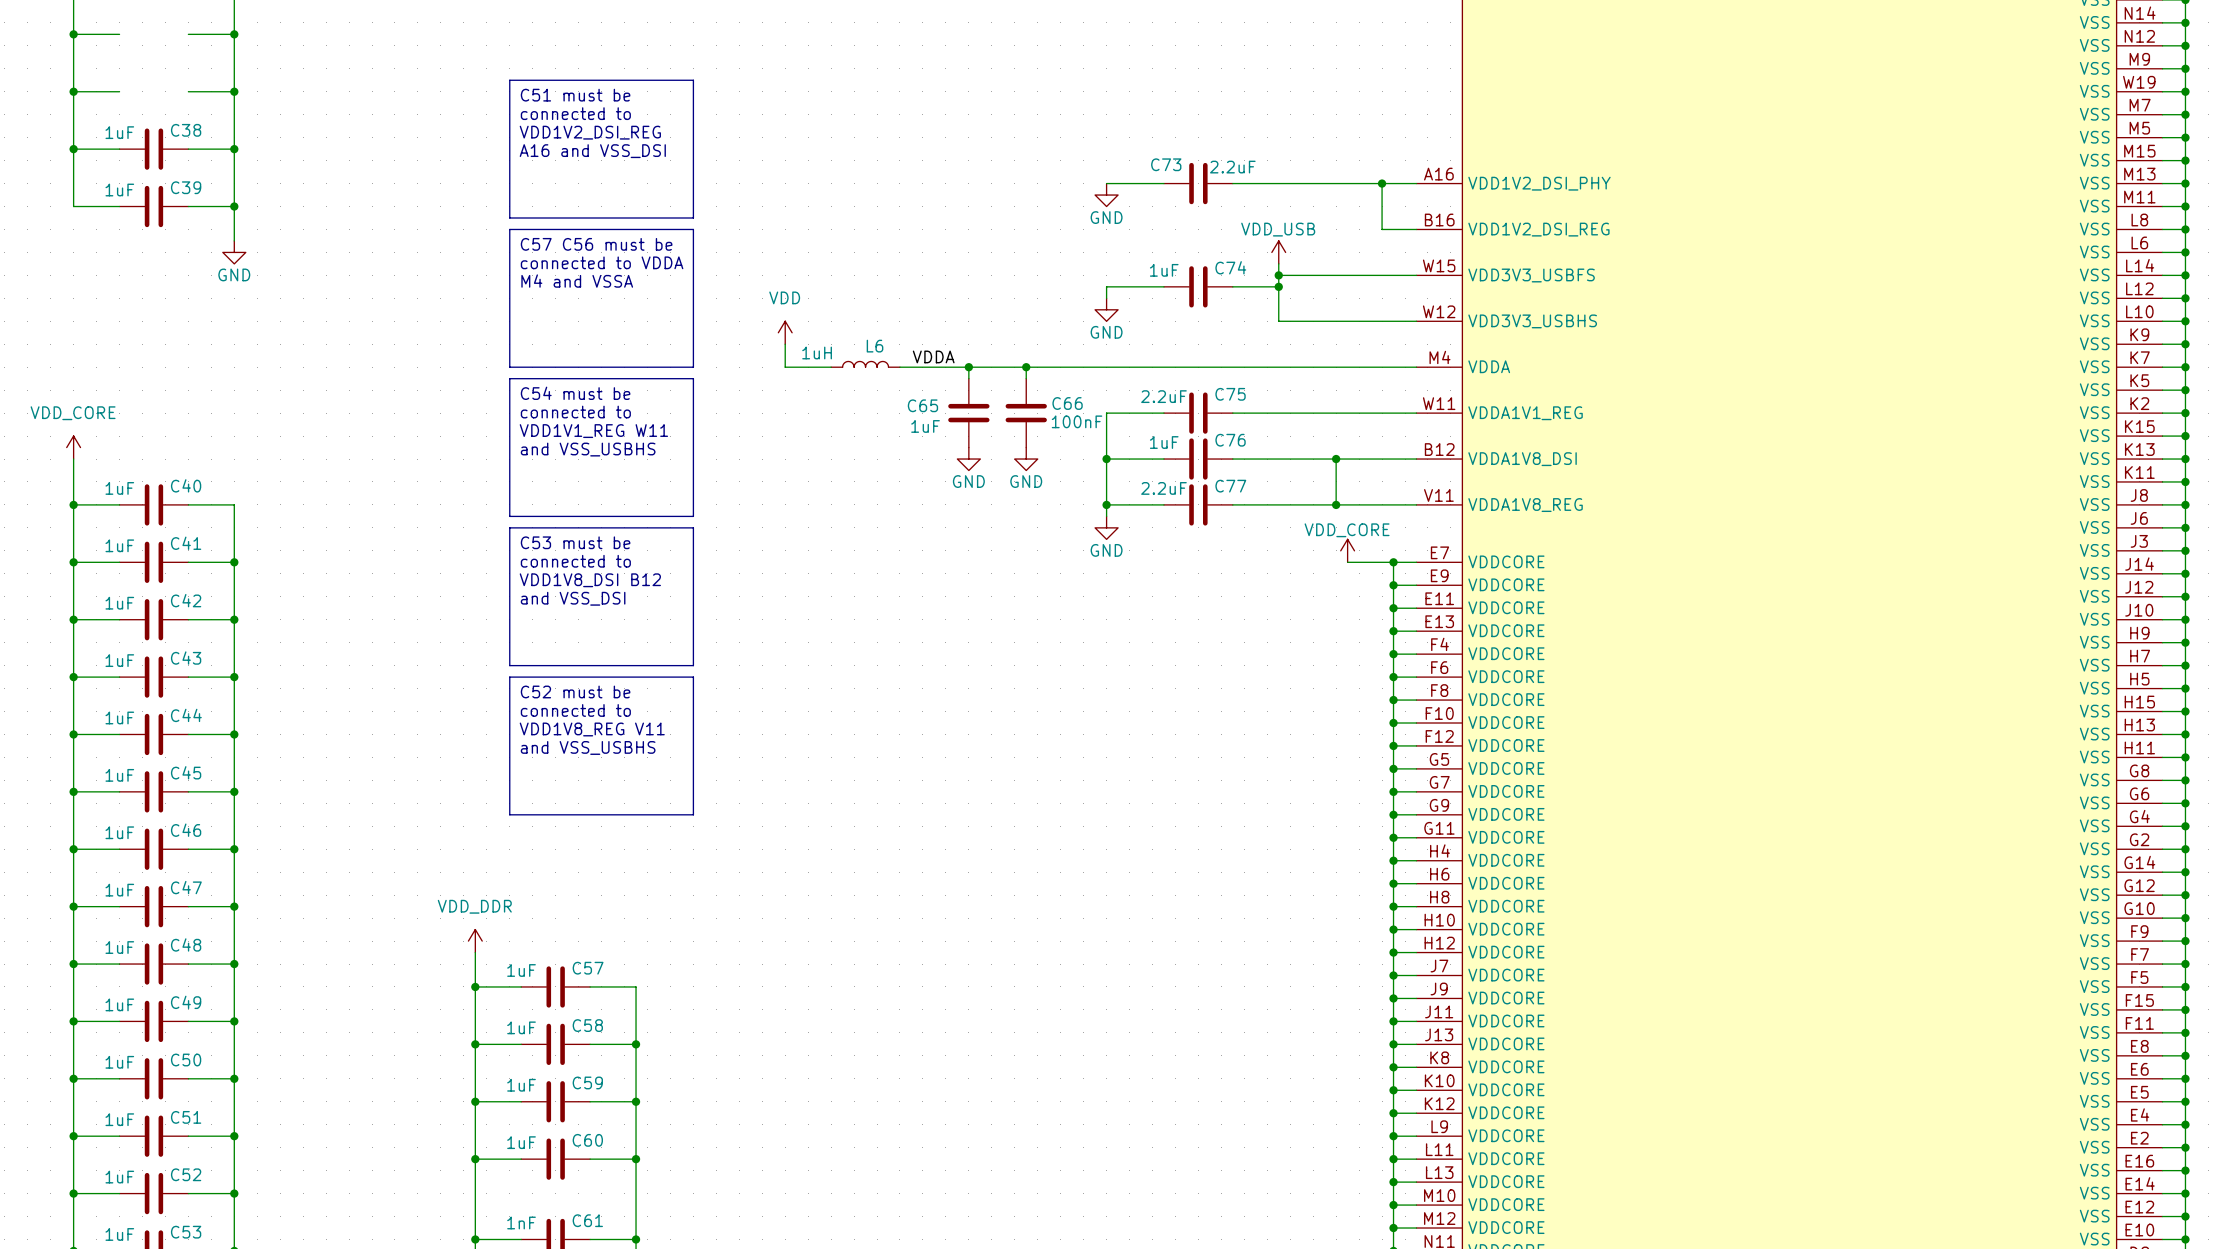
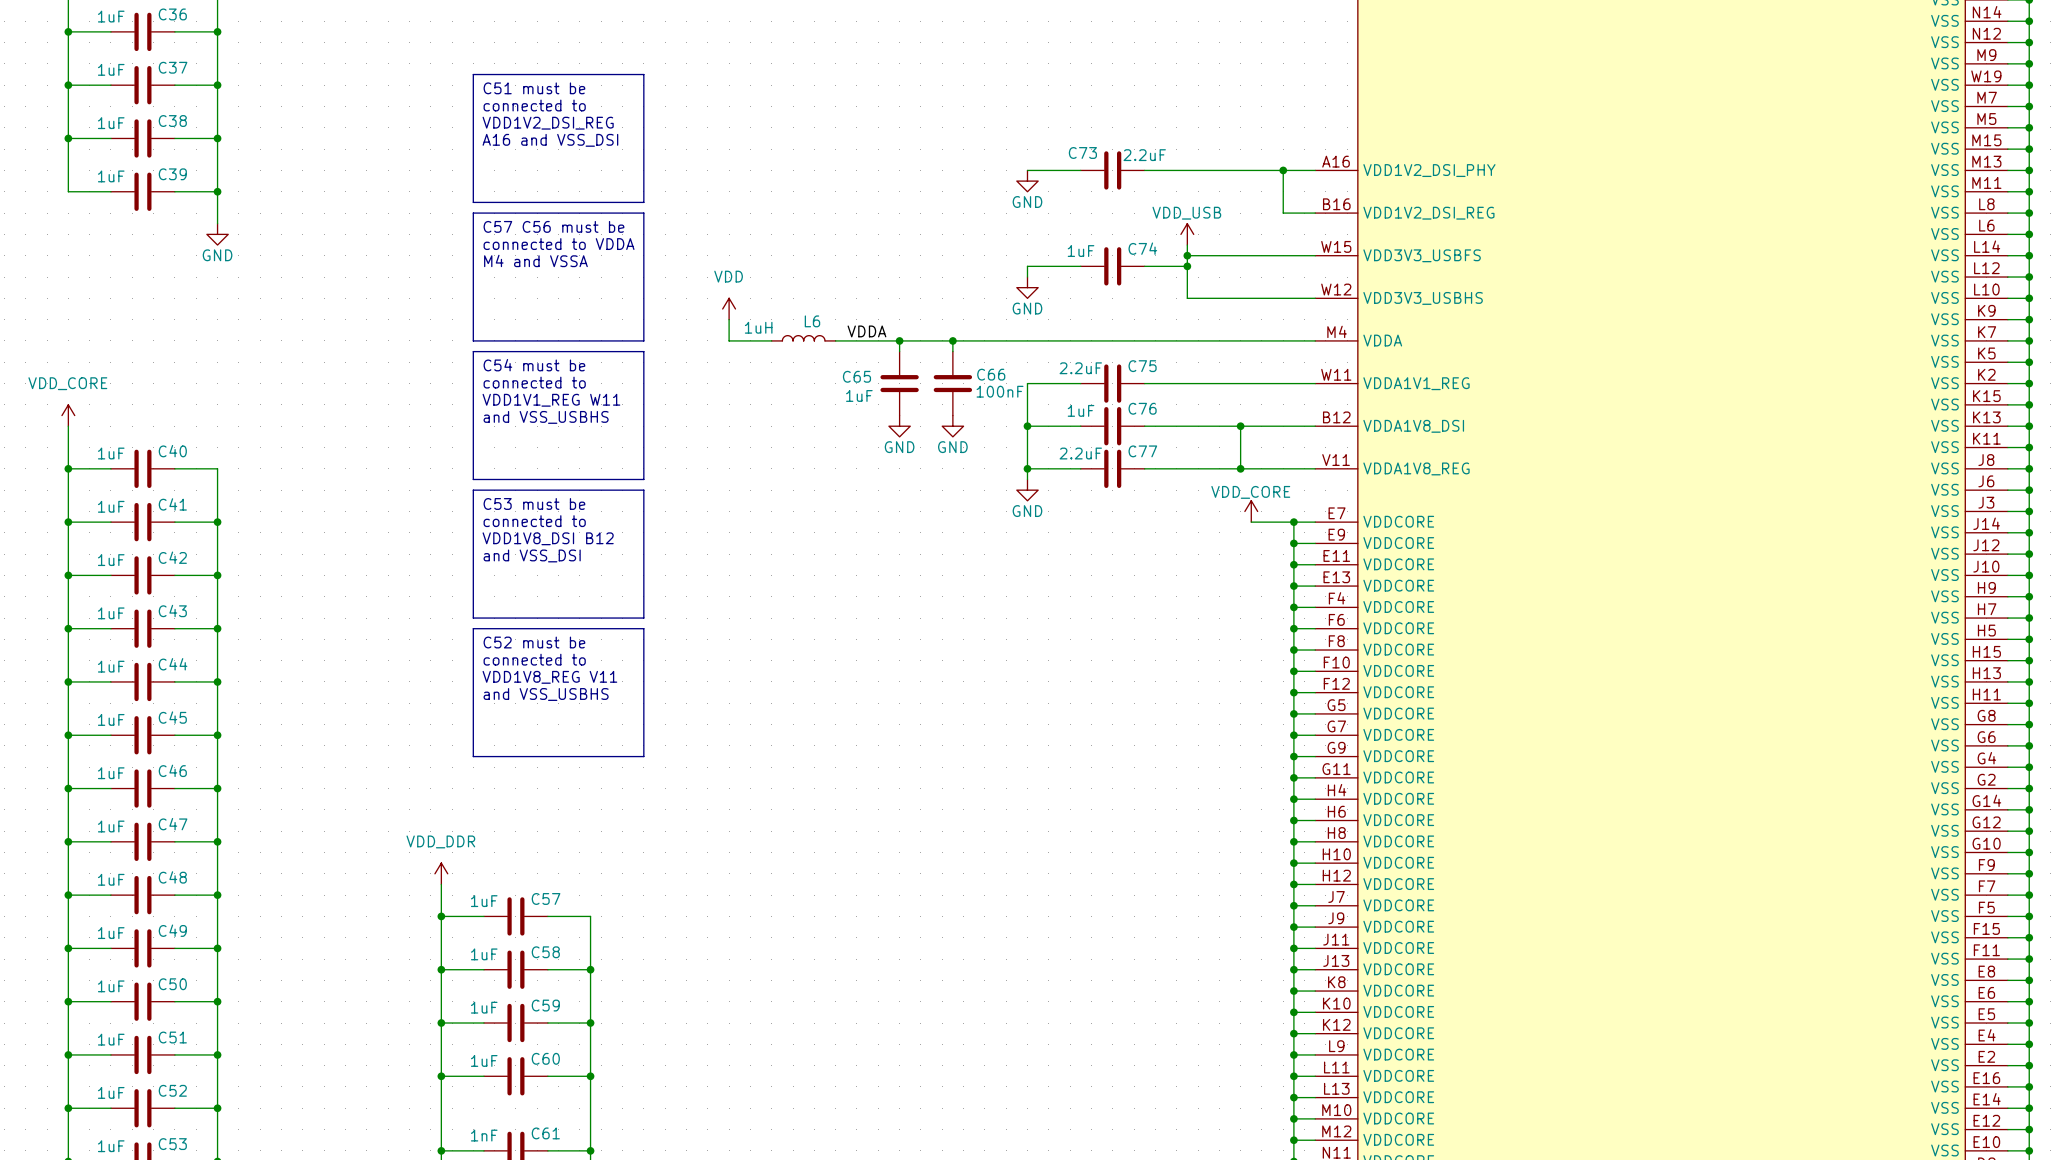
C36: none -> 1uF (142, 31)
C37: none -> 1uF (142, 85)

